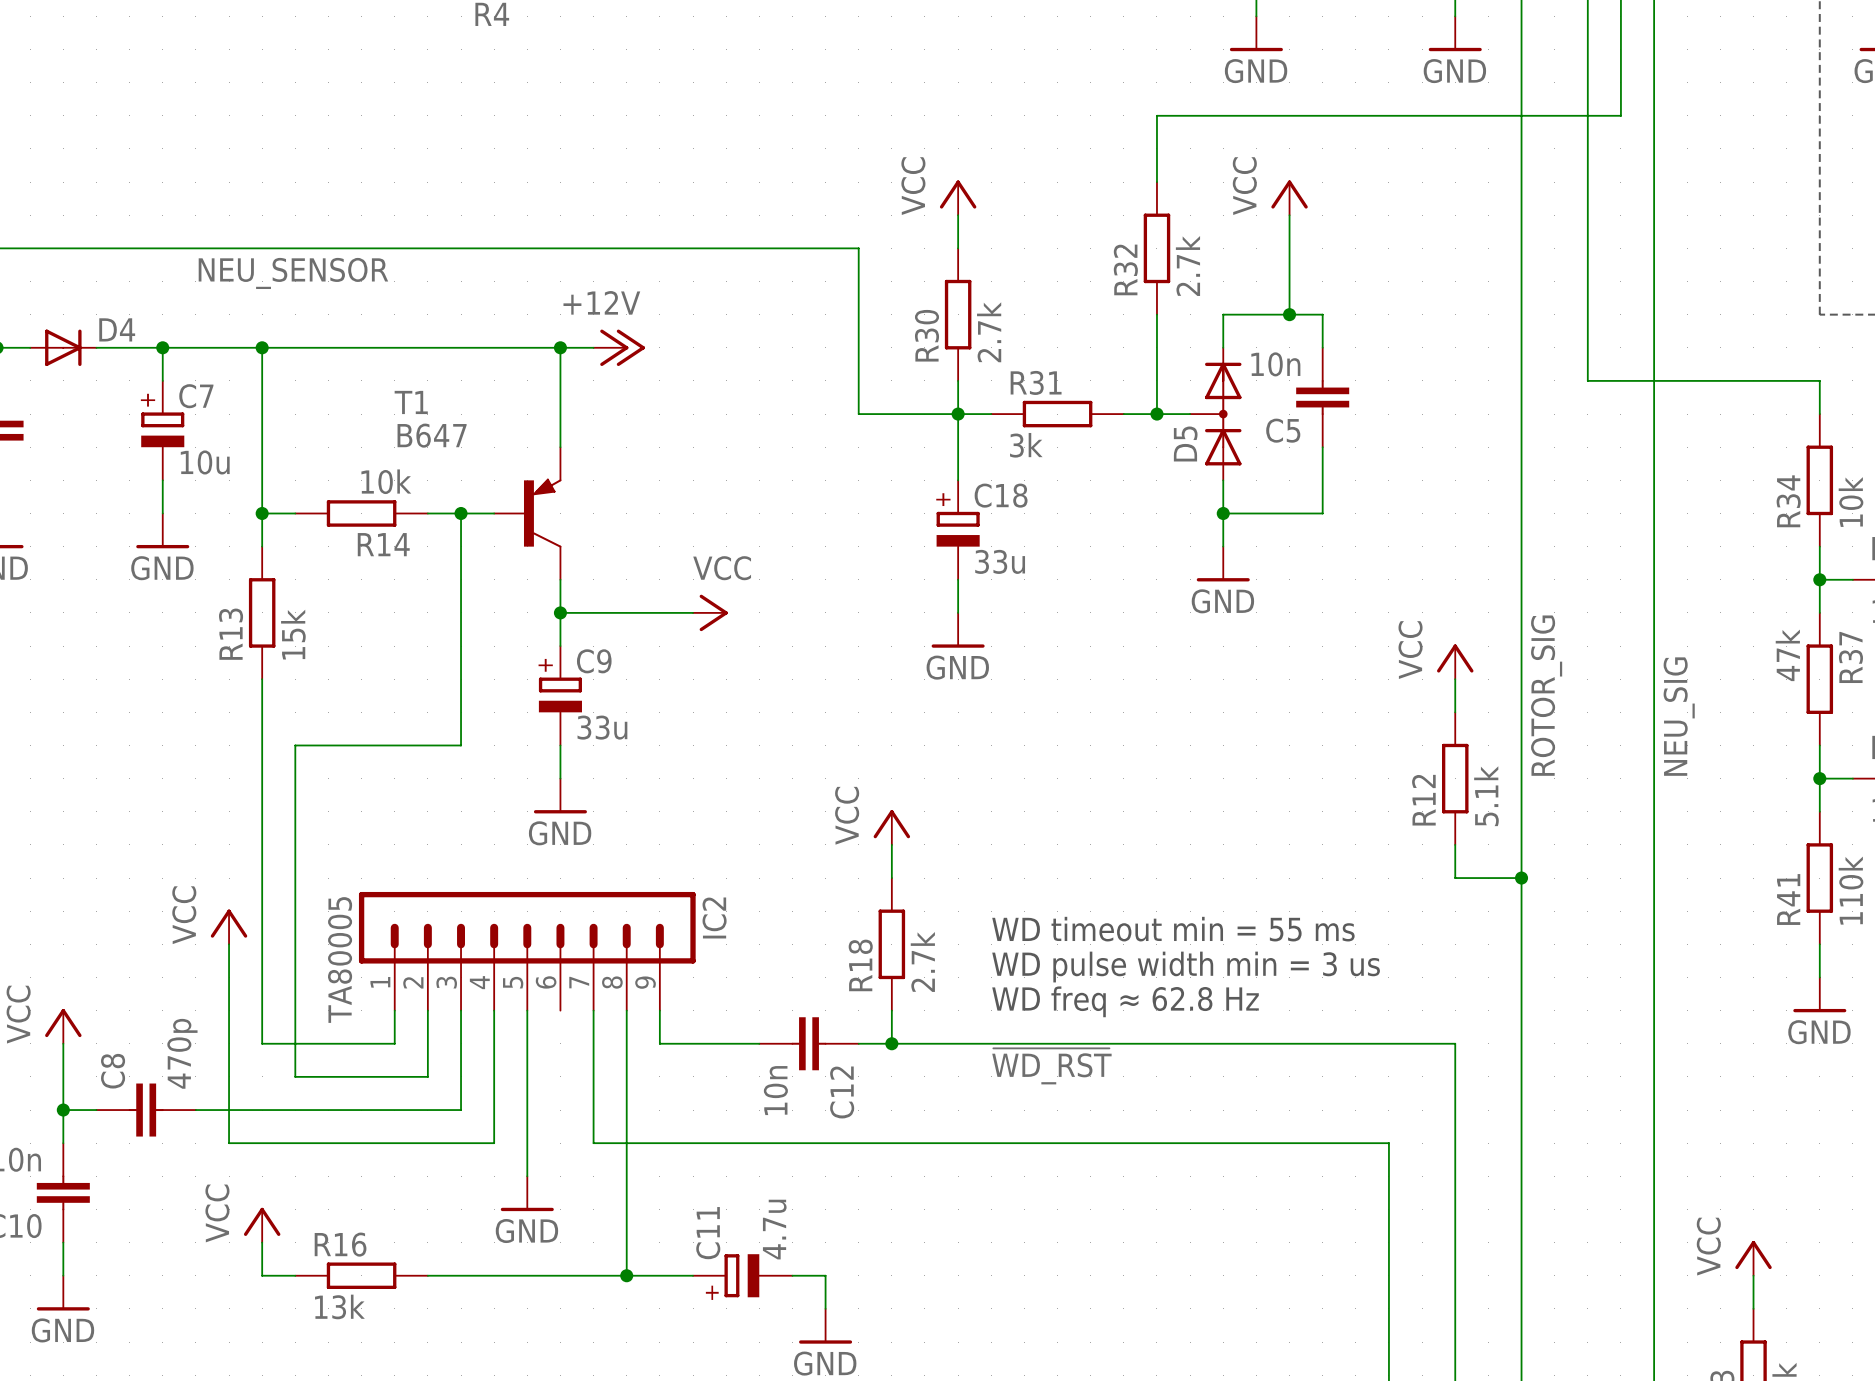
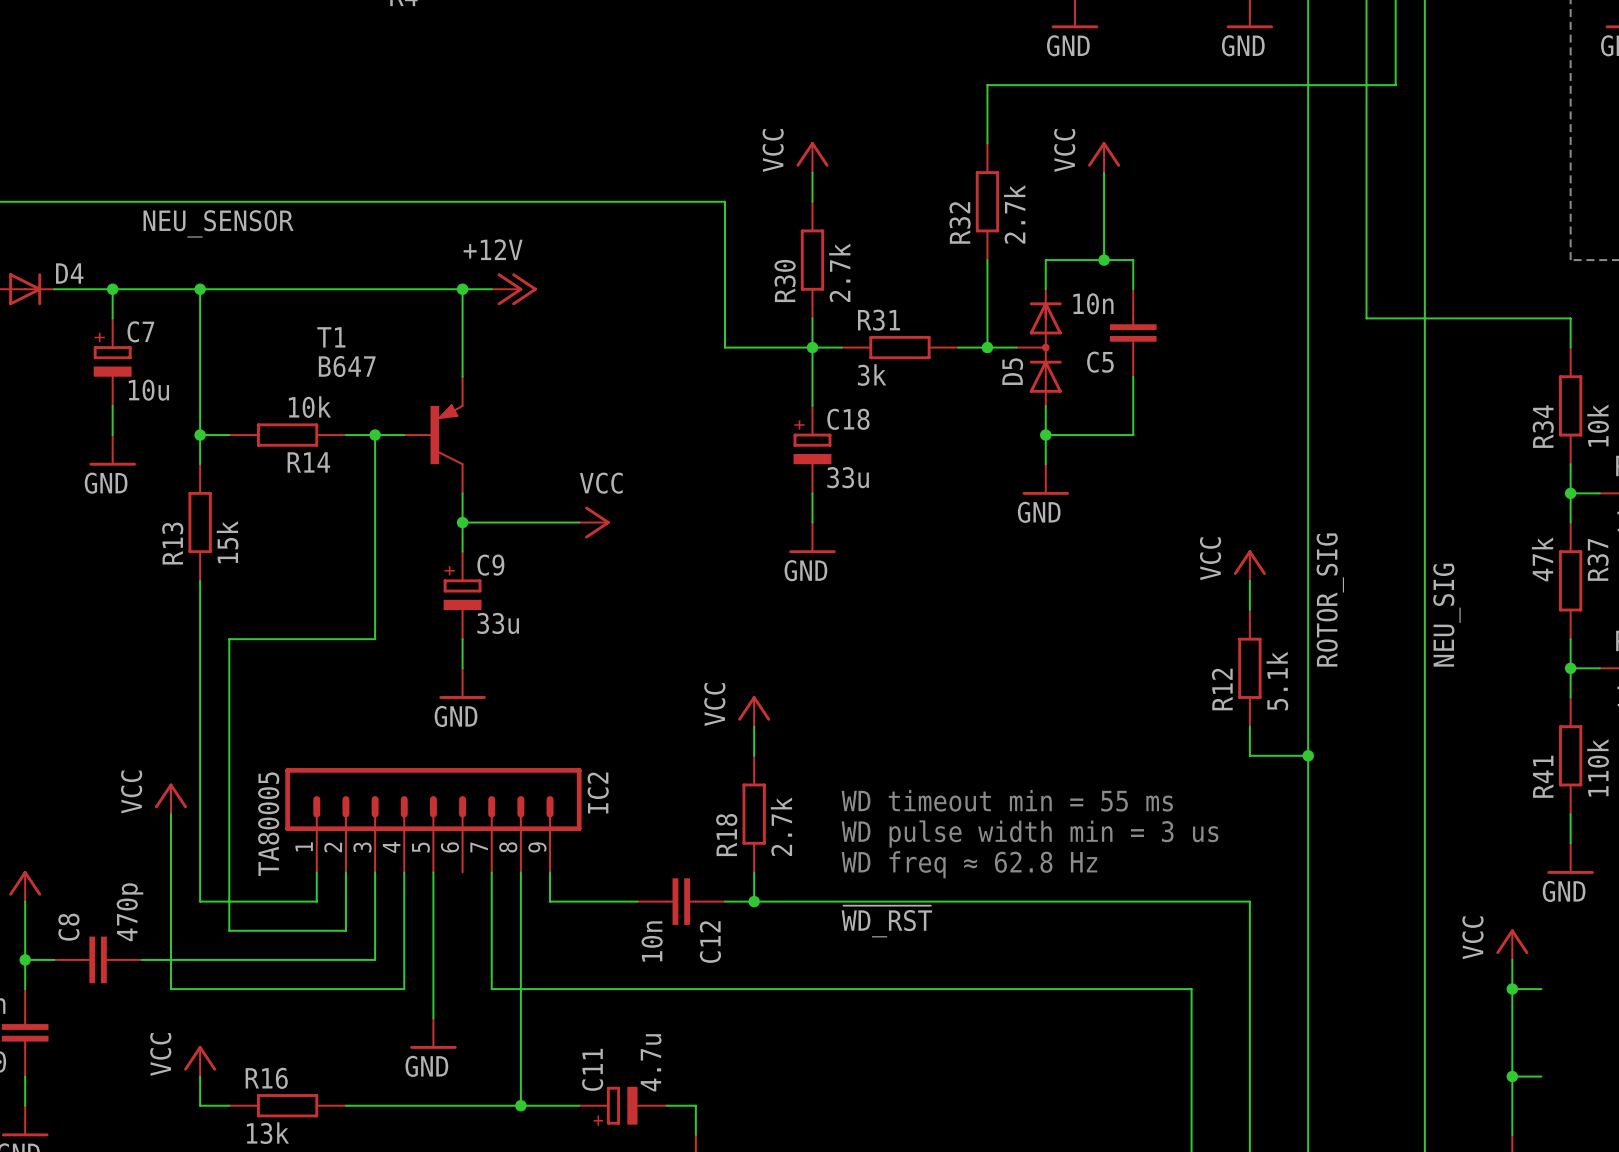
power symbol: none -> VCC (1512, 944)
wire: none -> (1512, 959) (1512, 1105)
wire: none -> (1512, 989) (1541, 989)
junction: none -> (1512, 989)
wire: none -> (1512, 1076) (1541, 1076)
junction: none -> (1512, 1076)
power symbol: VCC (1753, 1258) -> none

